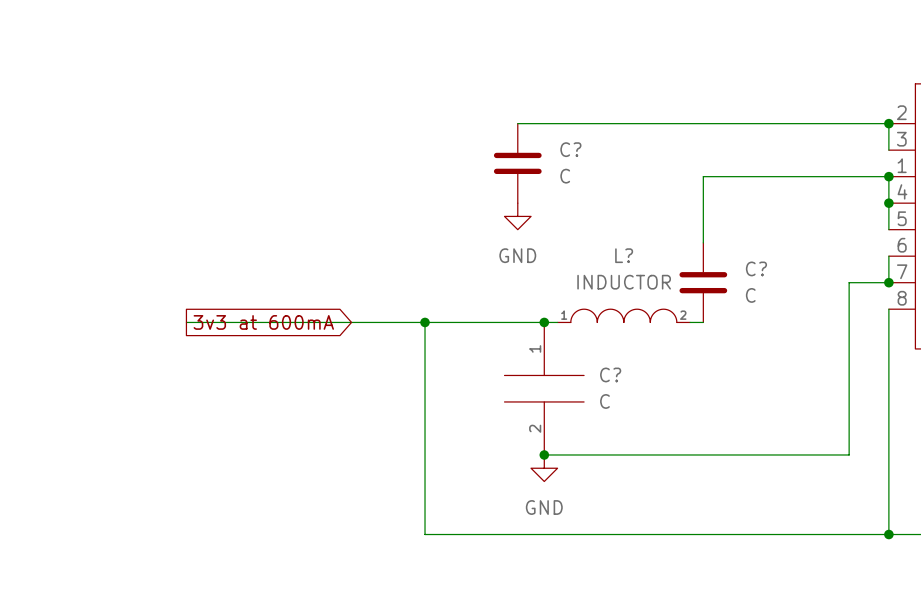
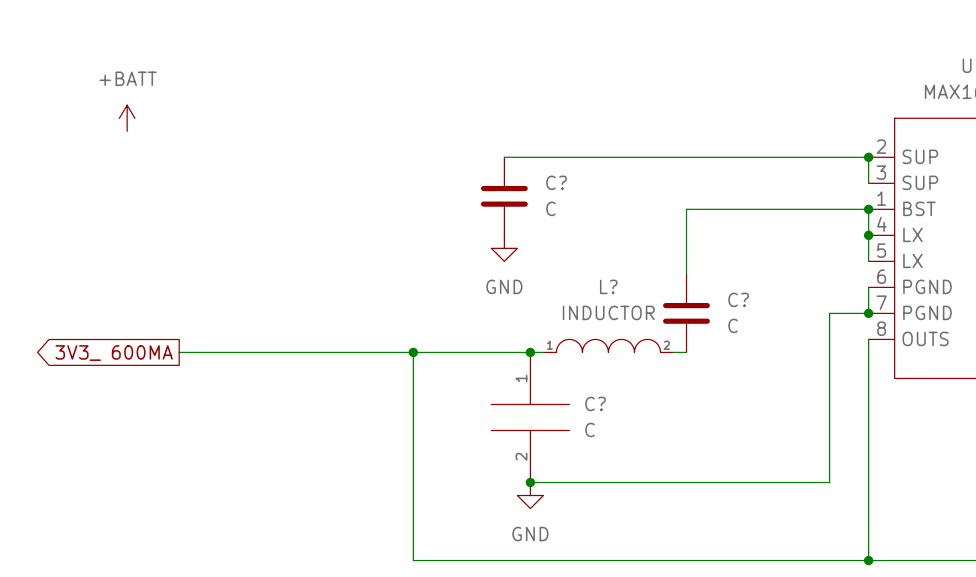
power symbol: none -> +BATT (127, 118)
global label: 3v3 at 600mA (263, 322) -> 3V3_ 600MA (114, 353)

